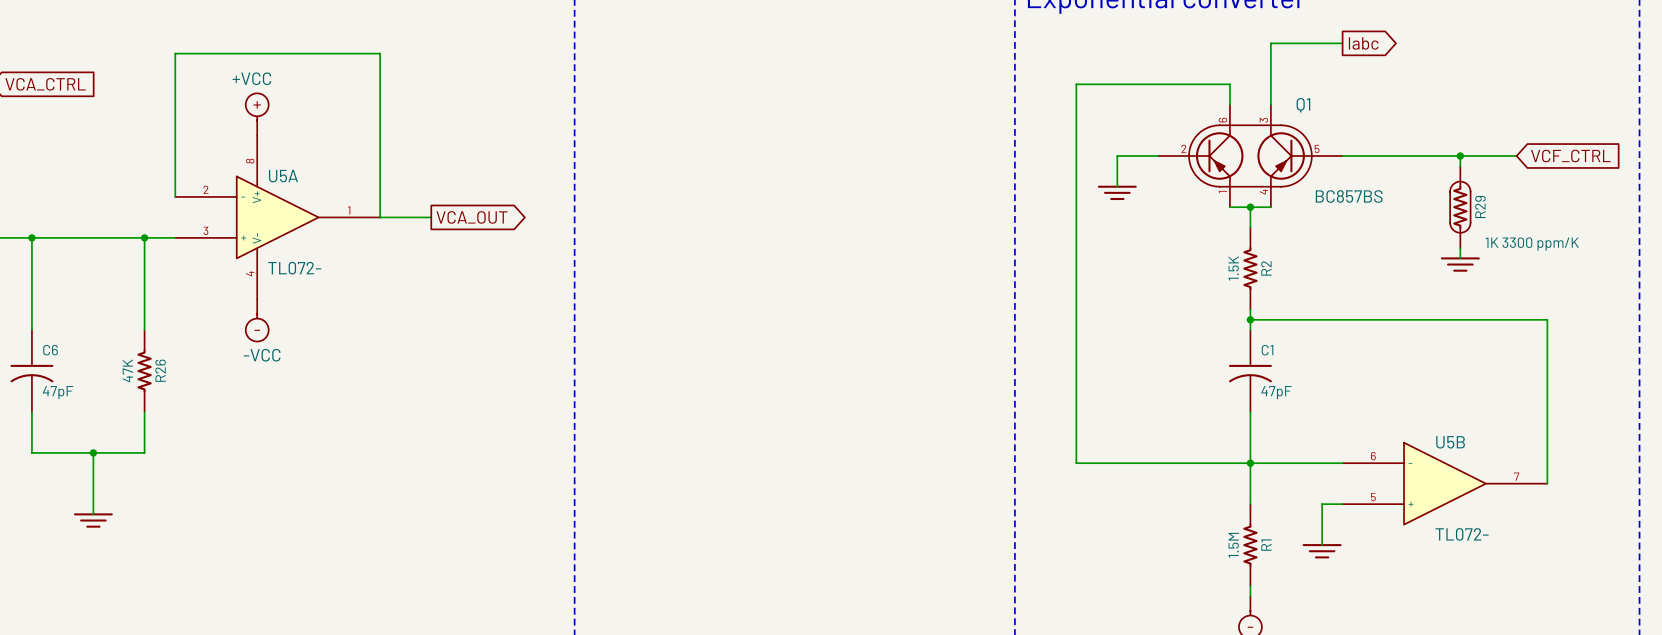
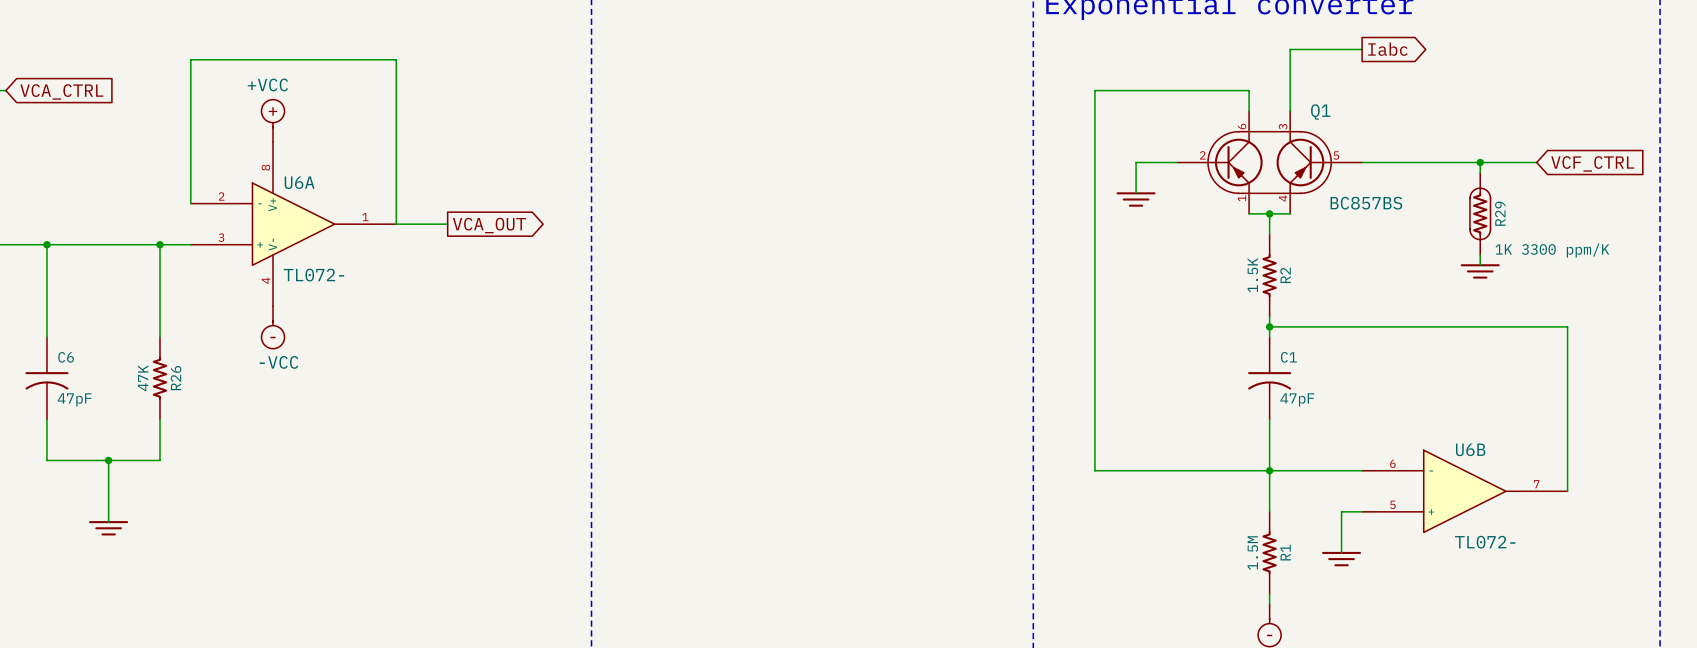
U5A name: U5A (283, 176) -> U6A (299, 182)
U5B name: U5B (1450, 442) -> U6B (1470, 449)

